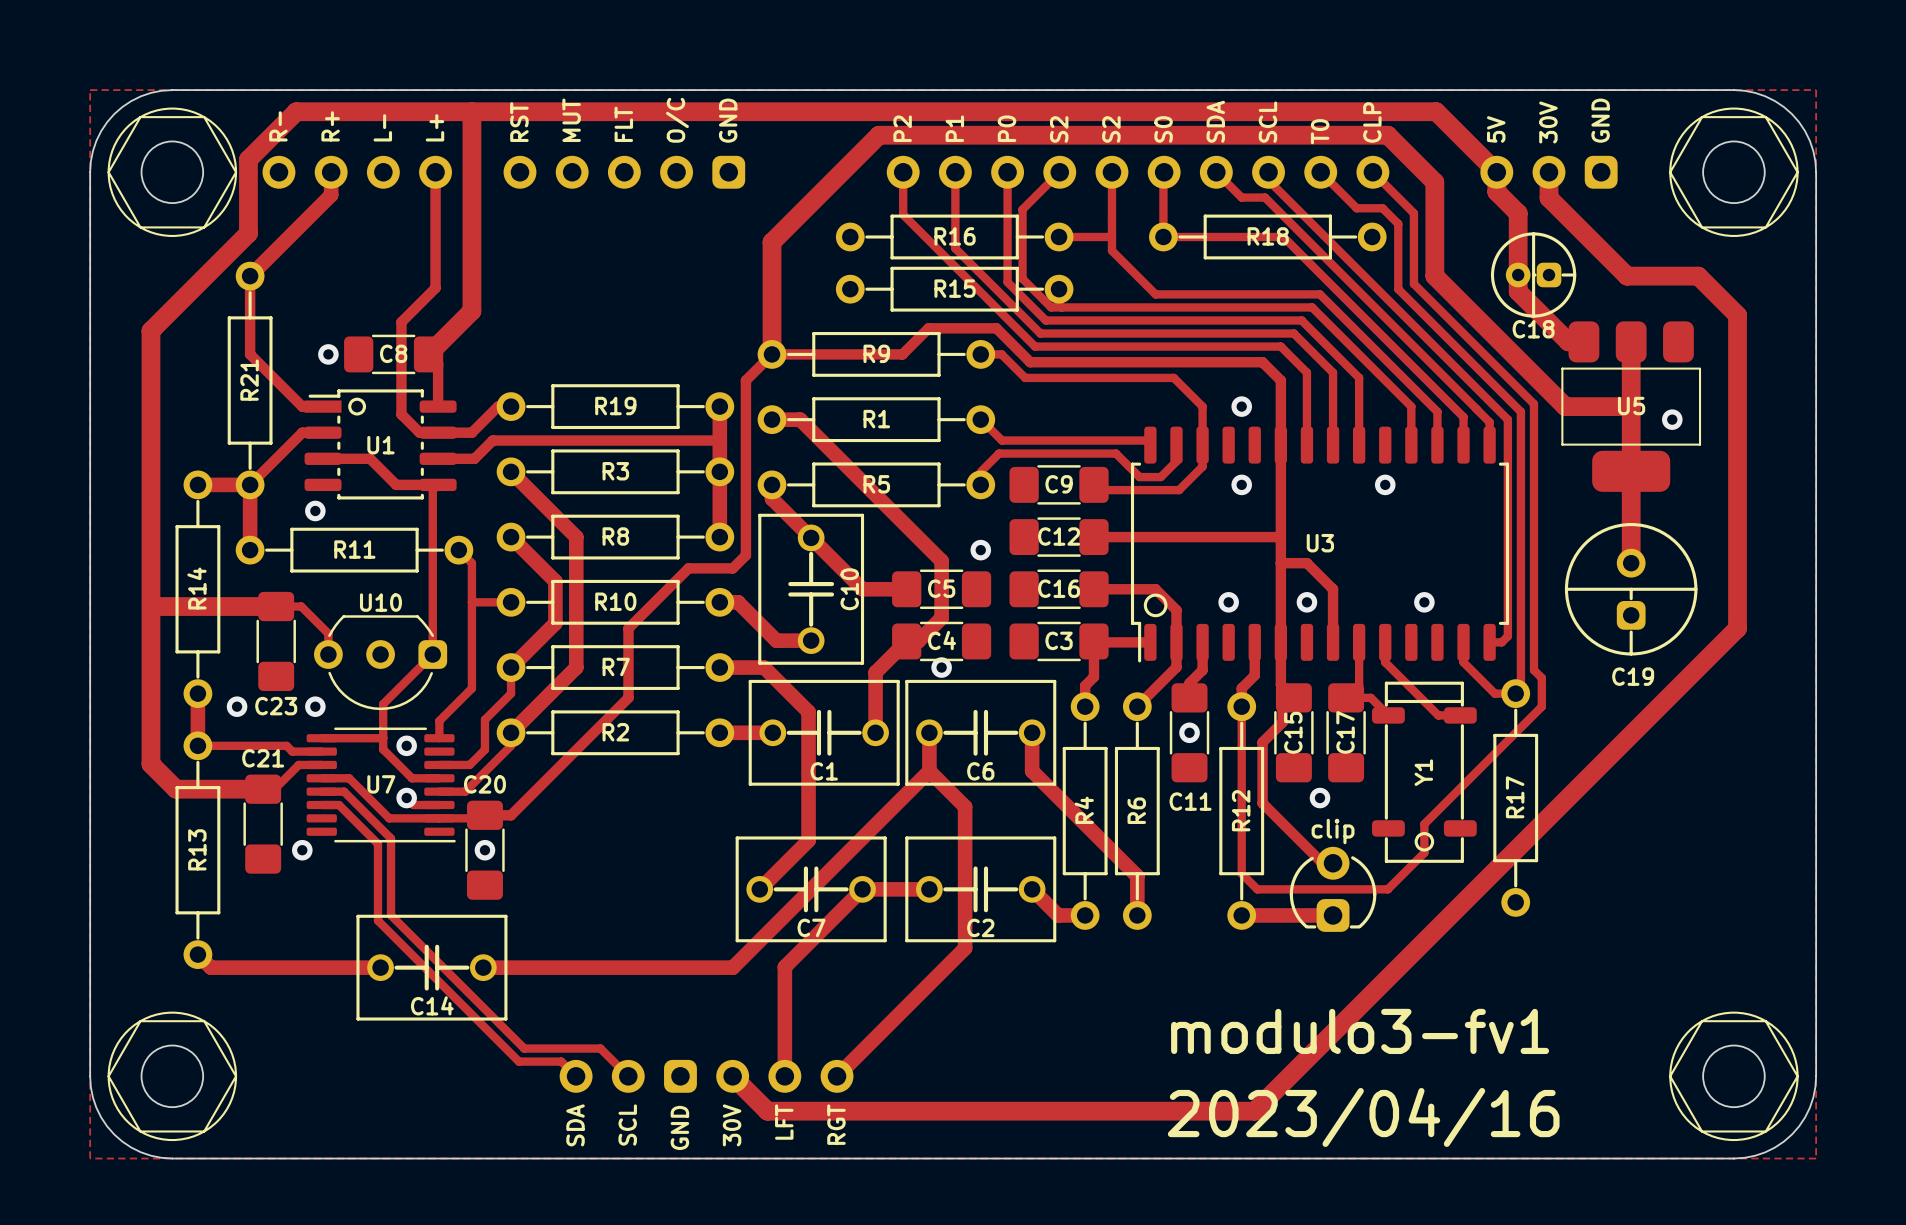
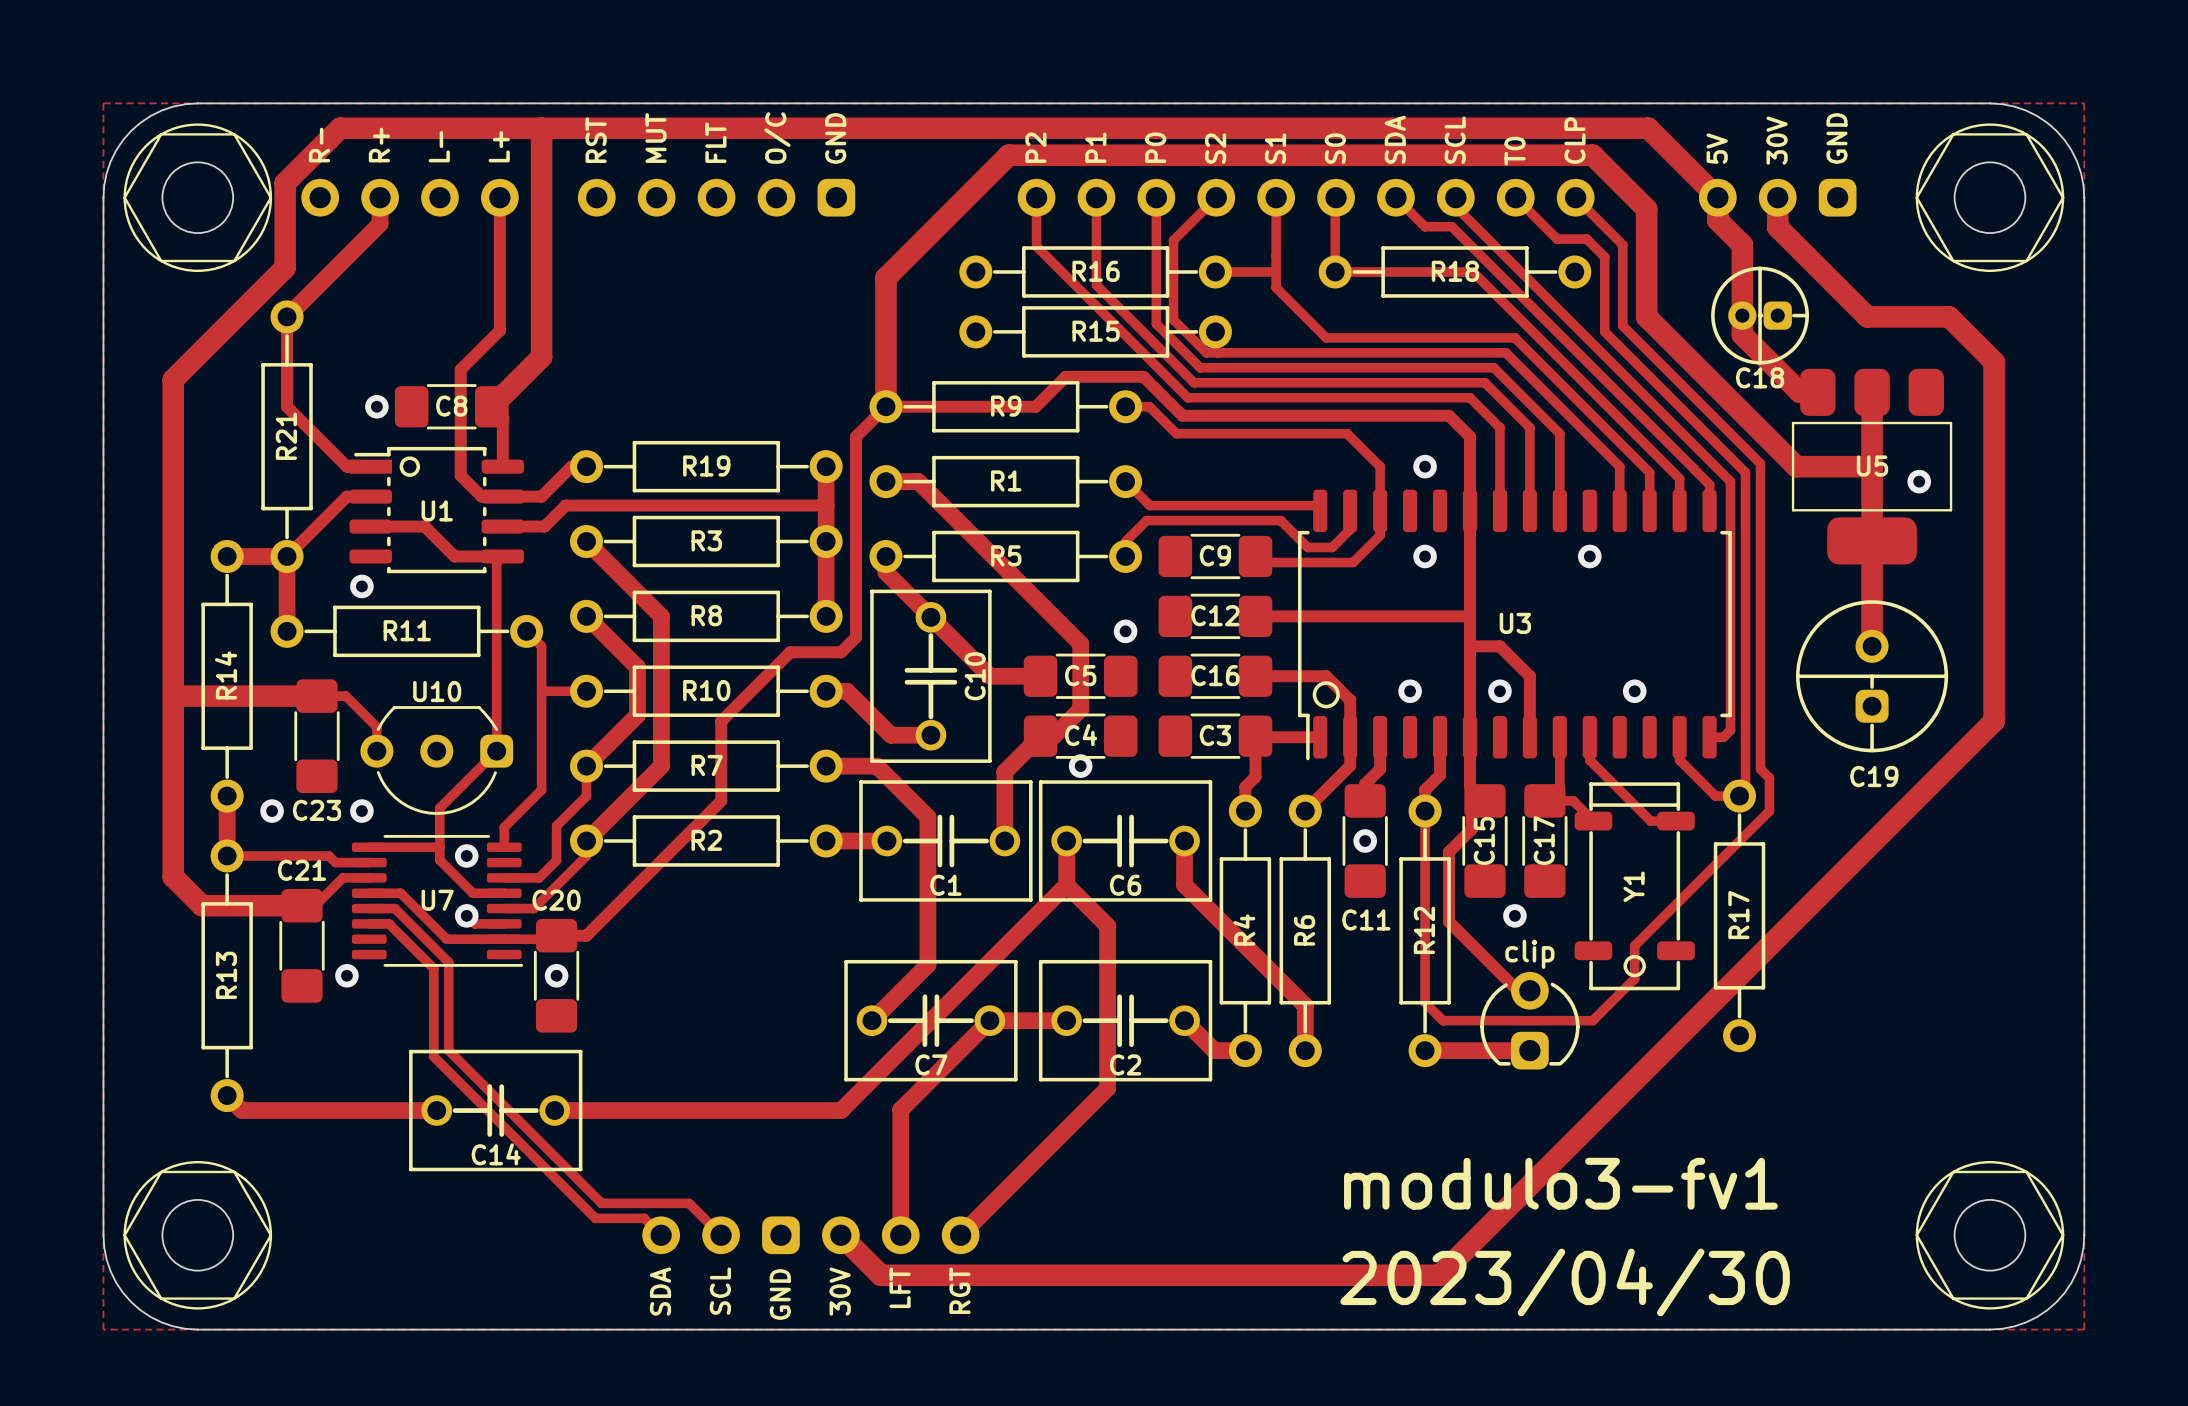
part text: S2 (1111, 129) -> S1 (1275, 148)
text: 2023/04/16 (1363, 1117) -> 2023/04/30 (1565, 1282)

